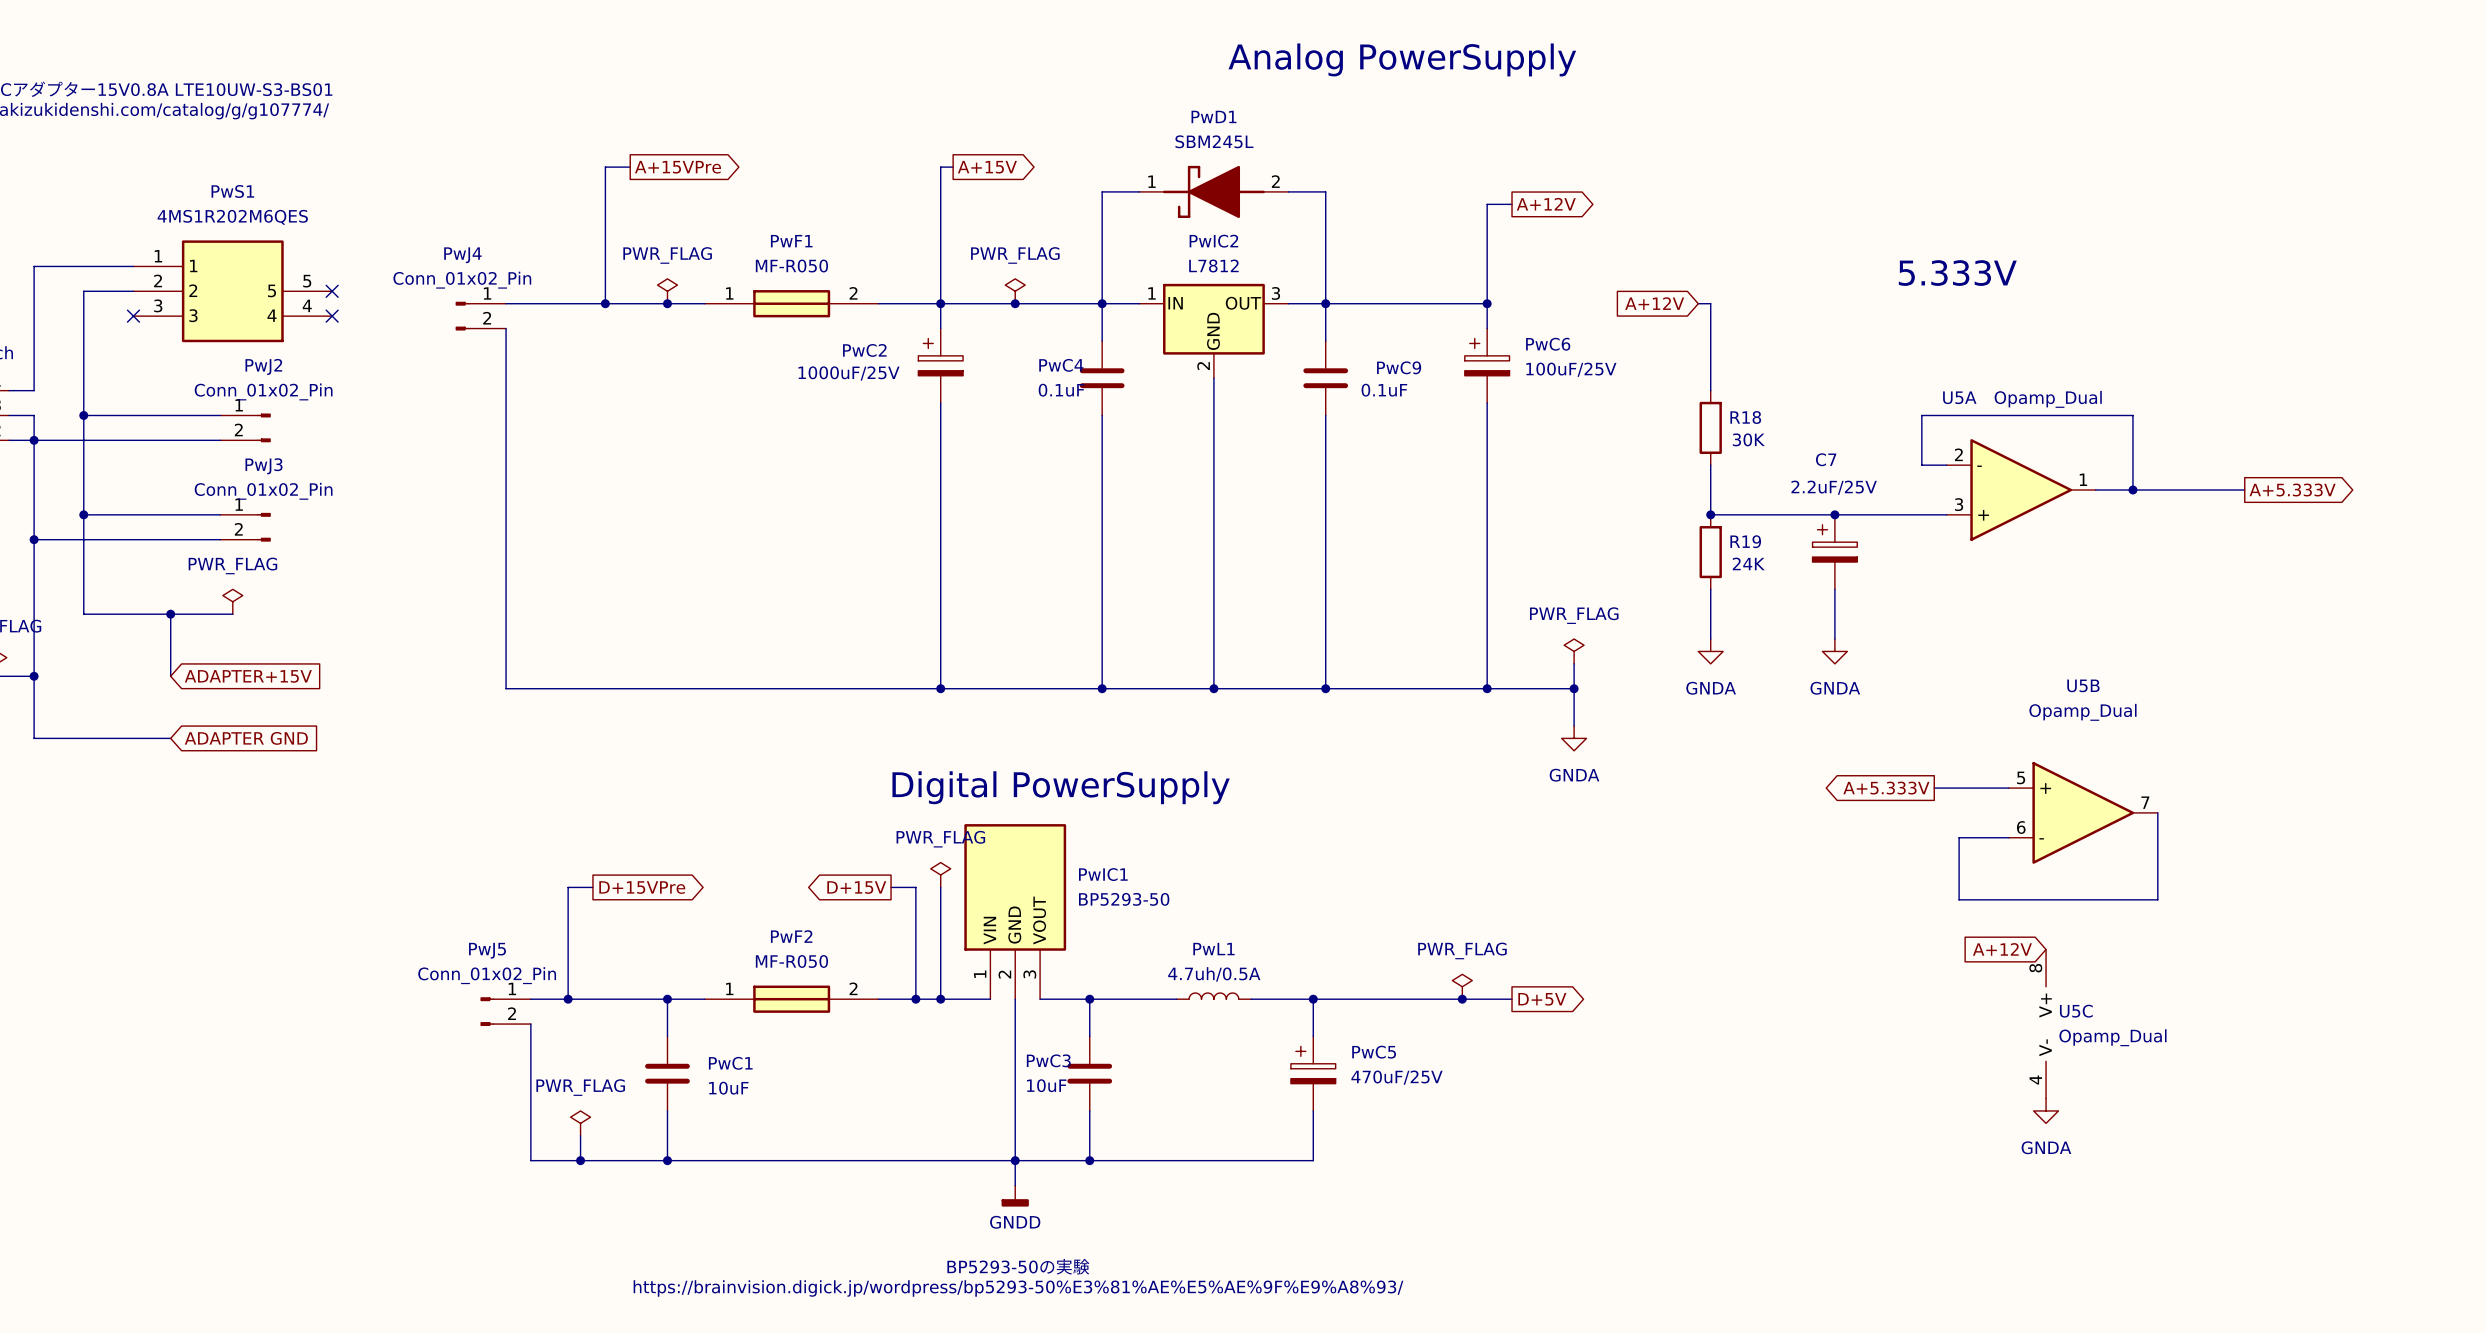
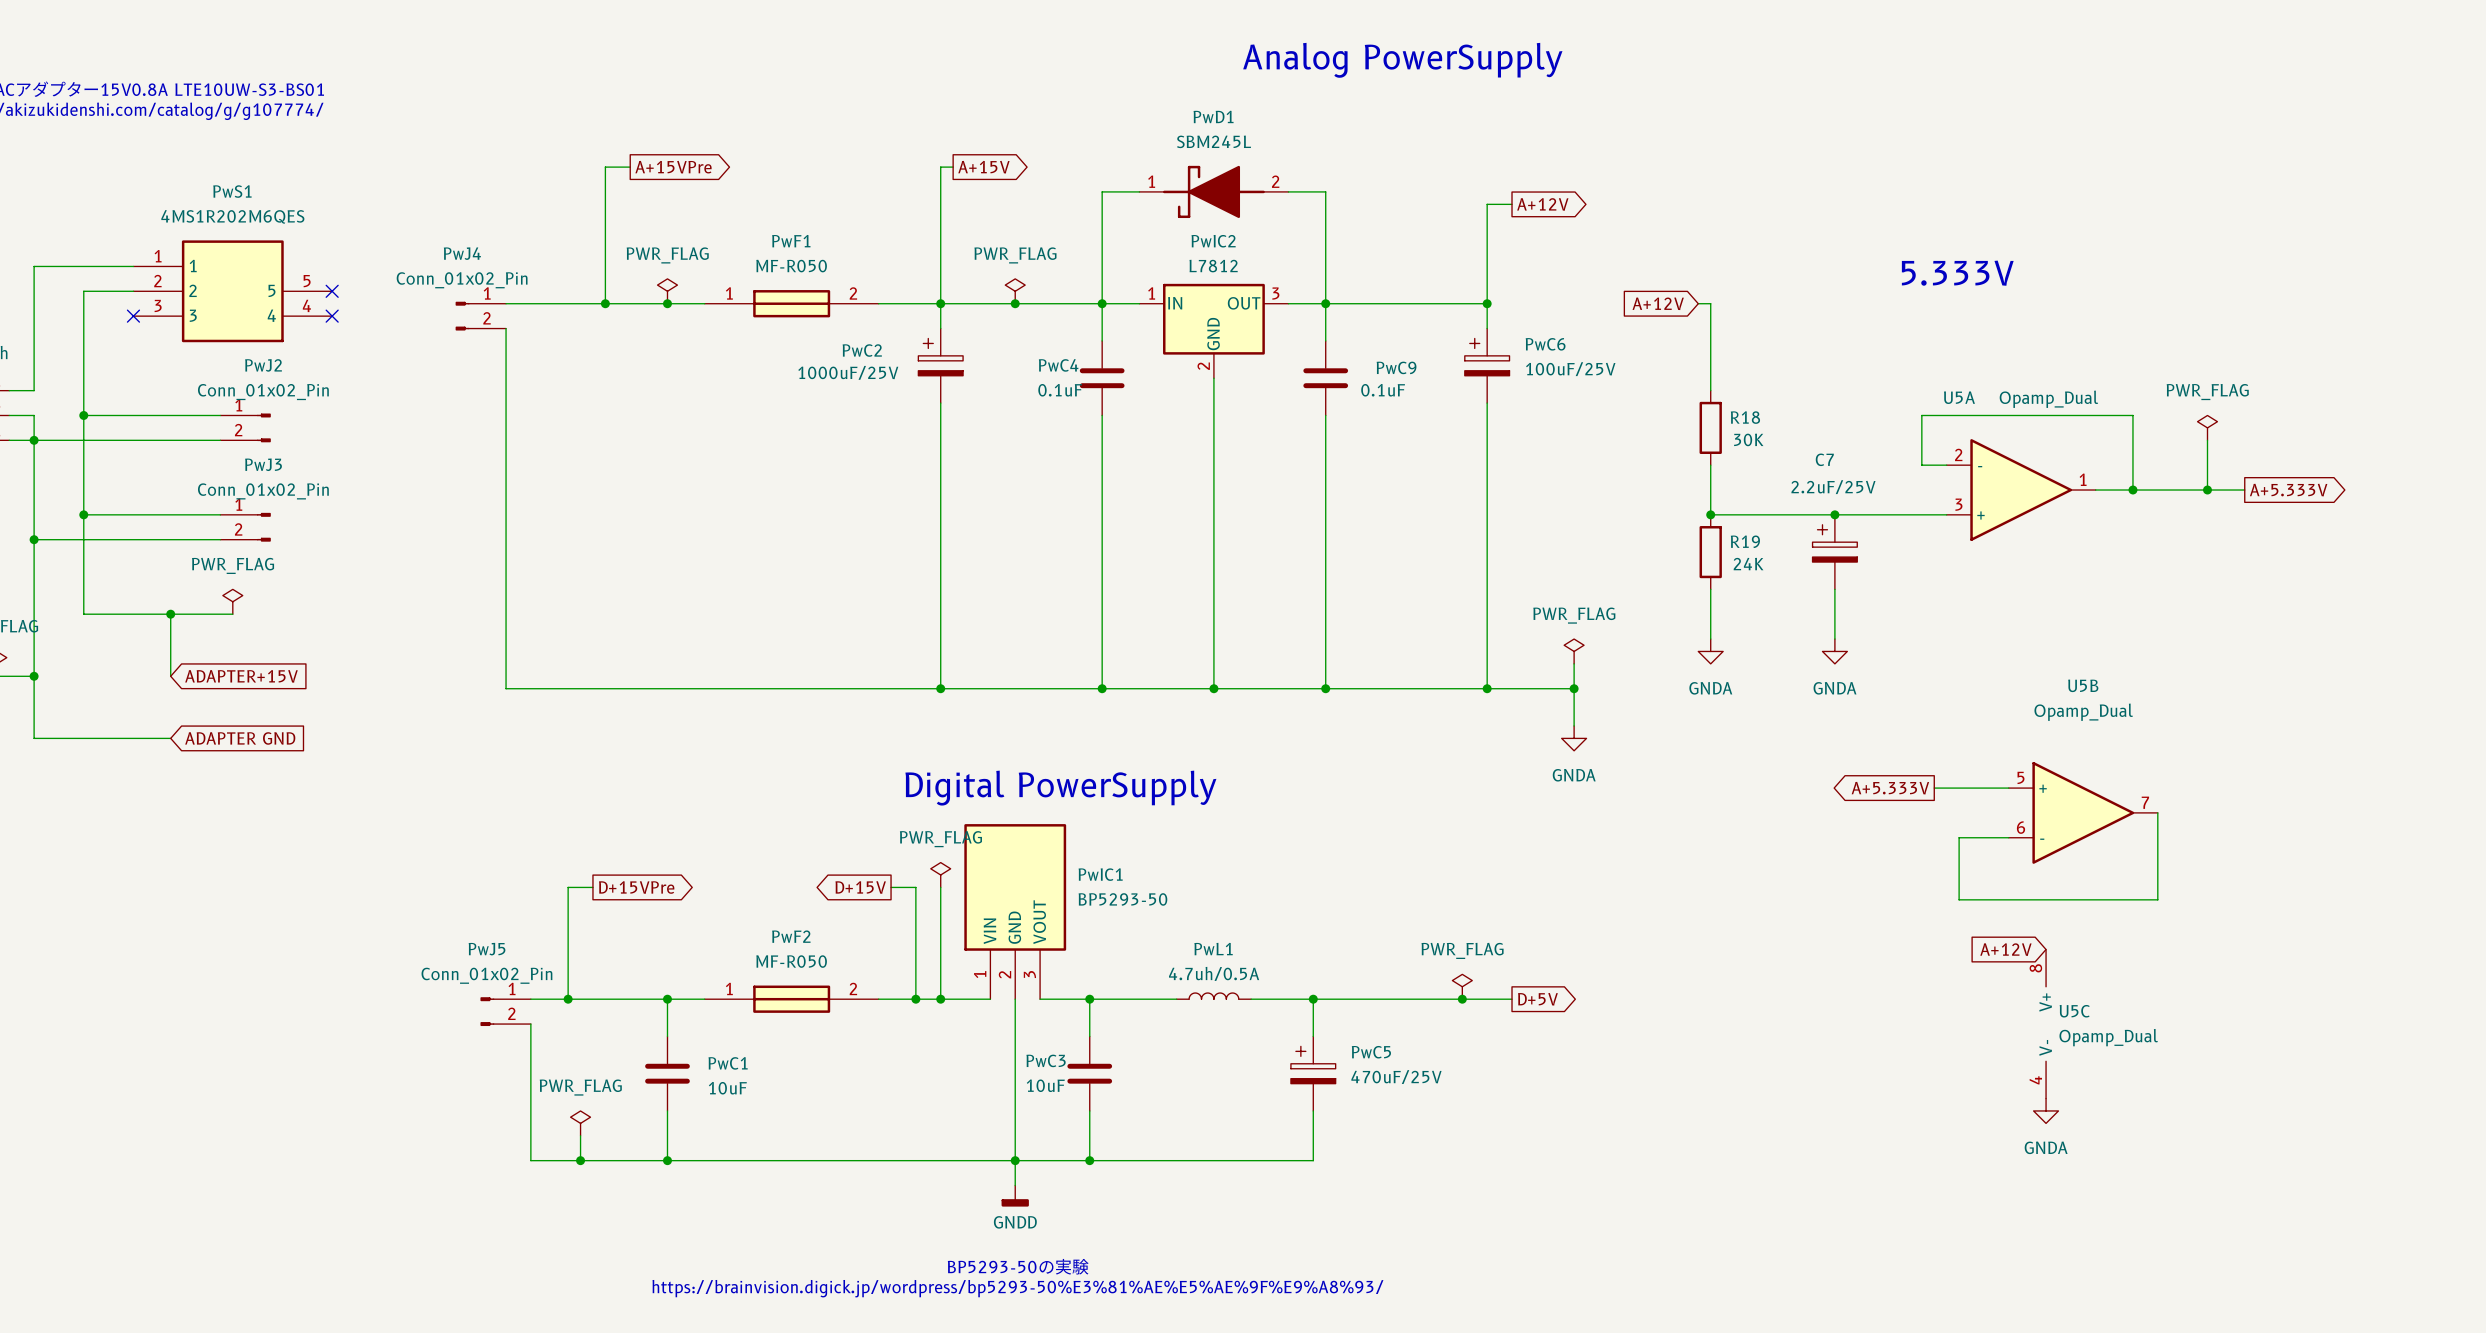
power symbol: none -> PWR_FLAG (2207, 427)
wire: none -> (2207, 440) (2207, 490)
junction: none -> (2207, 490)

